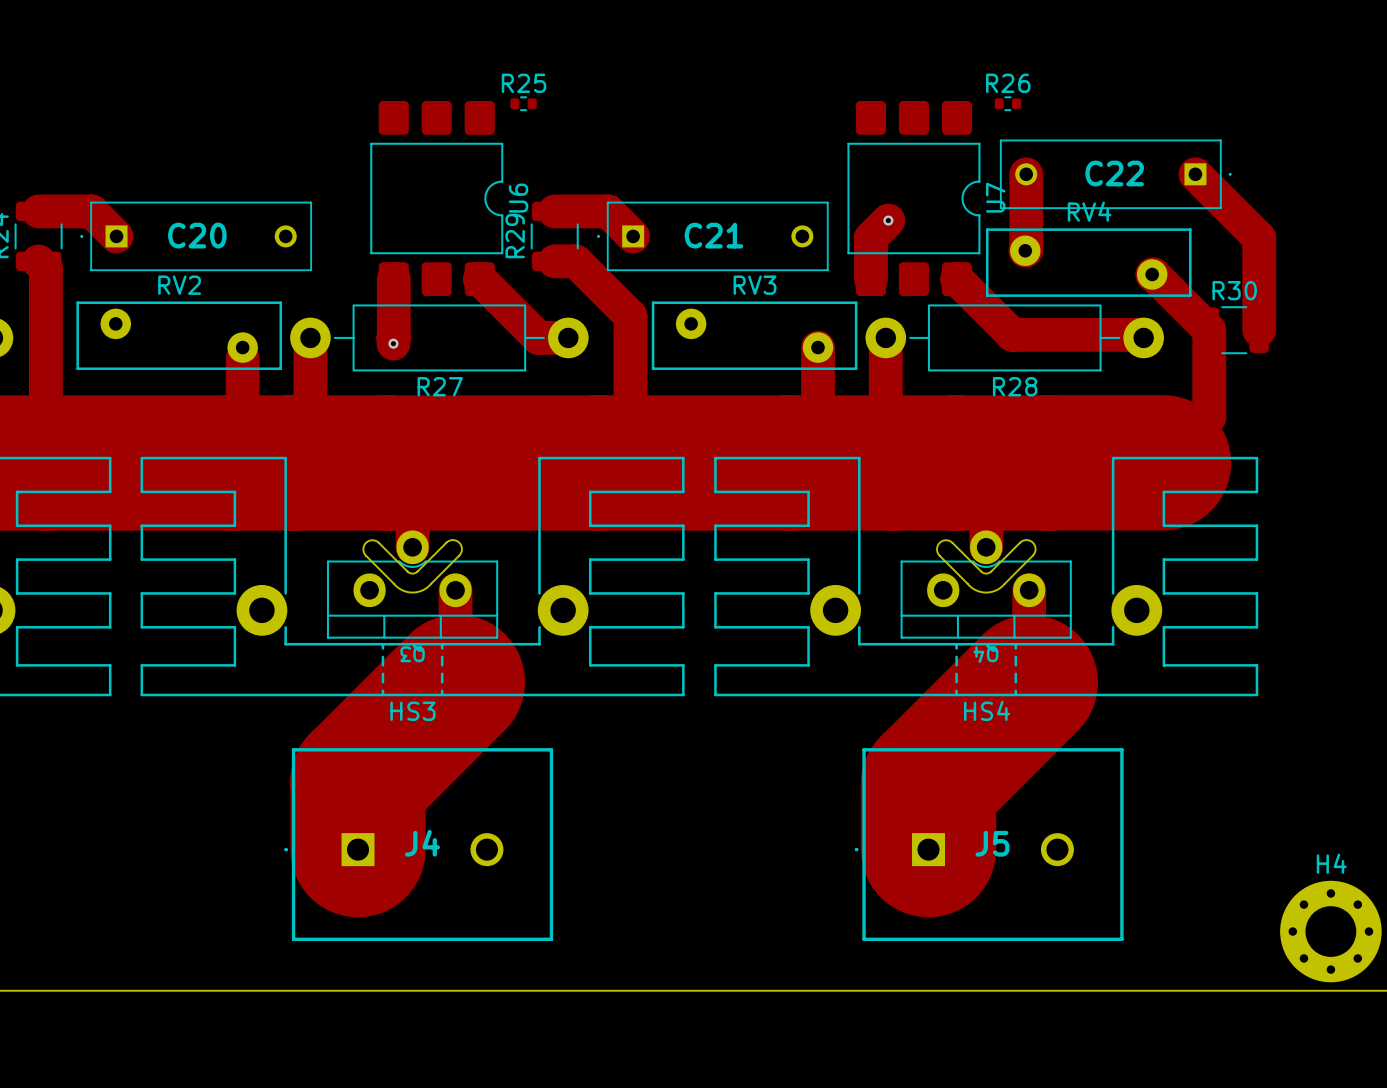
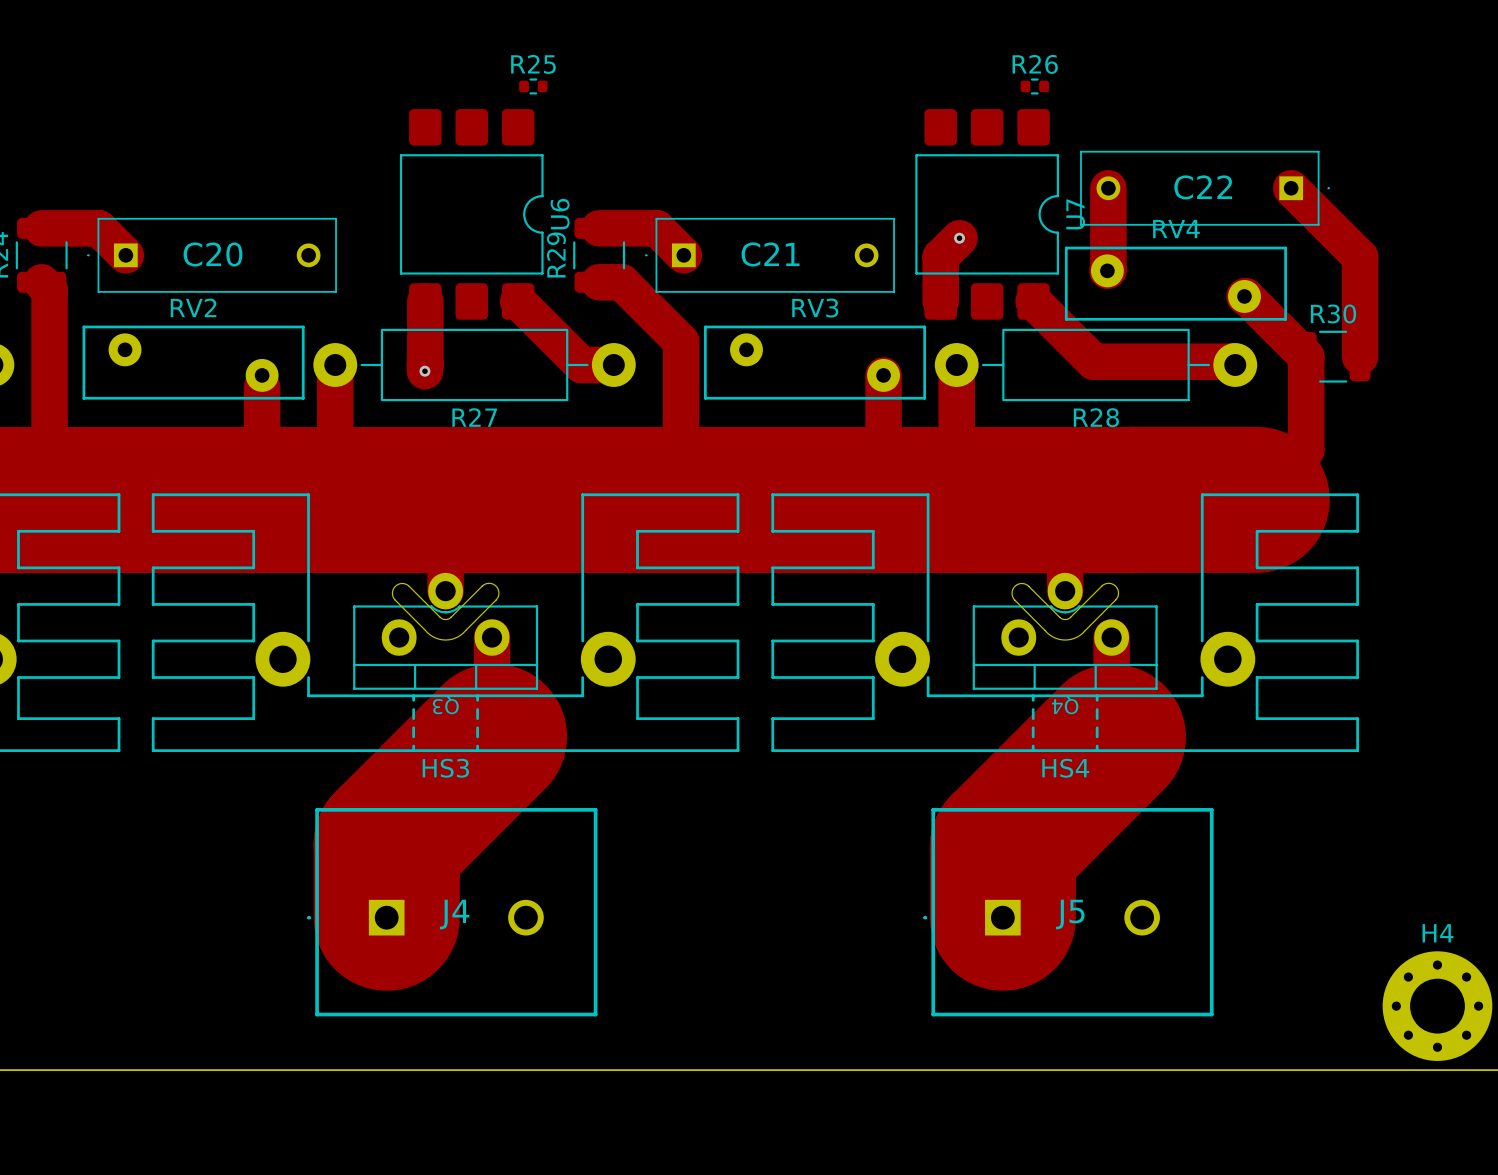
R25 position: (523, 103) -> (533, 86)
R26 position: (1007, 103) -> (1034, 86)

